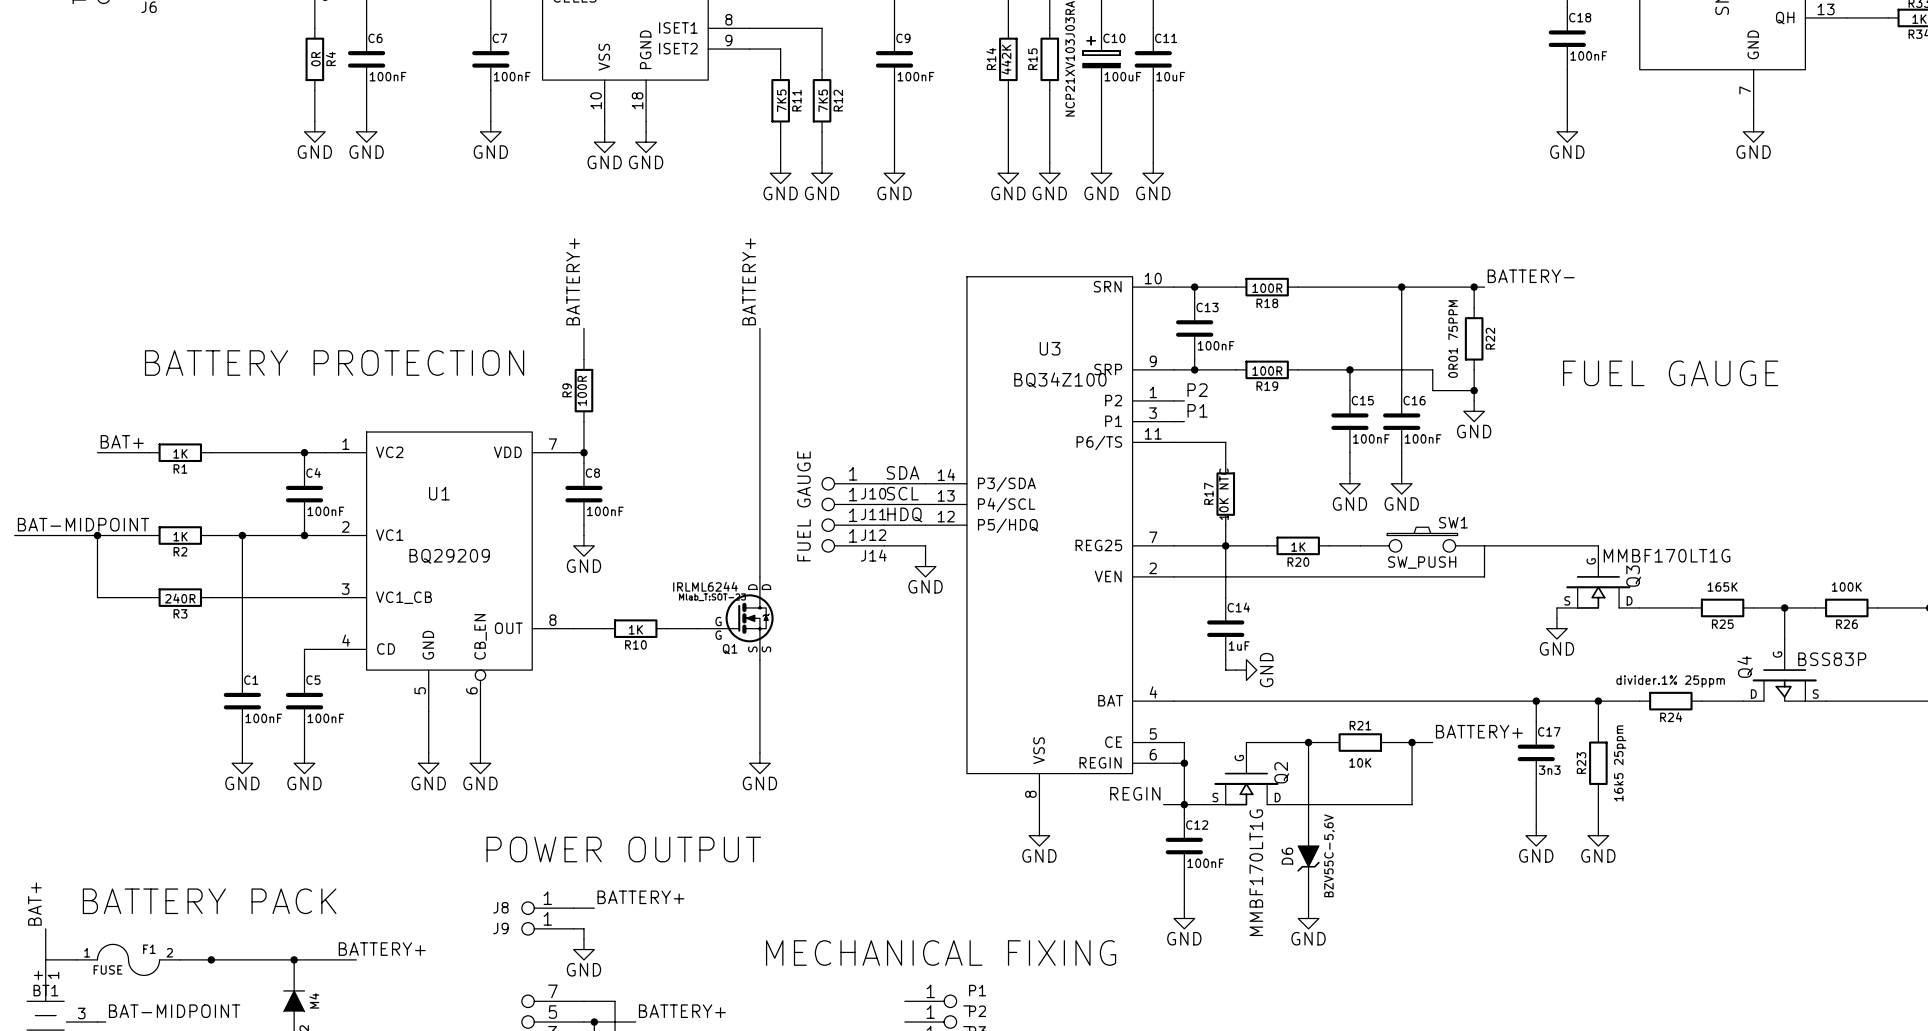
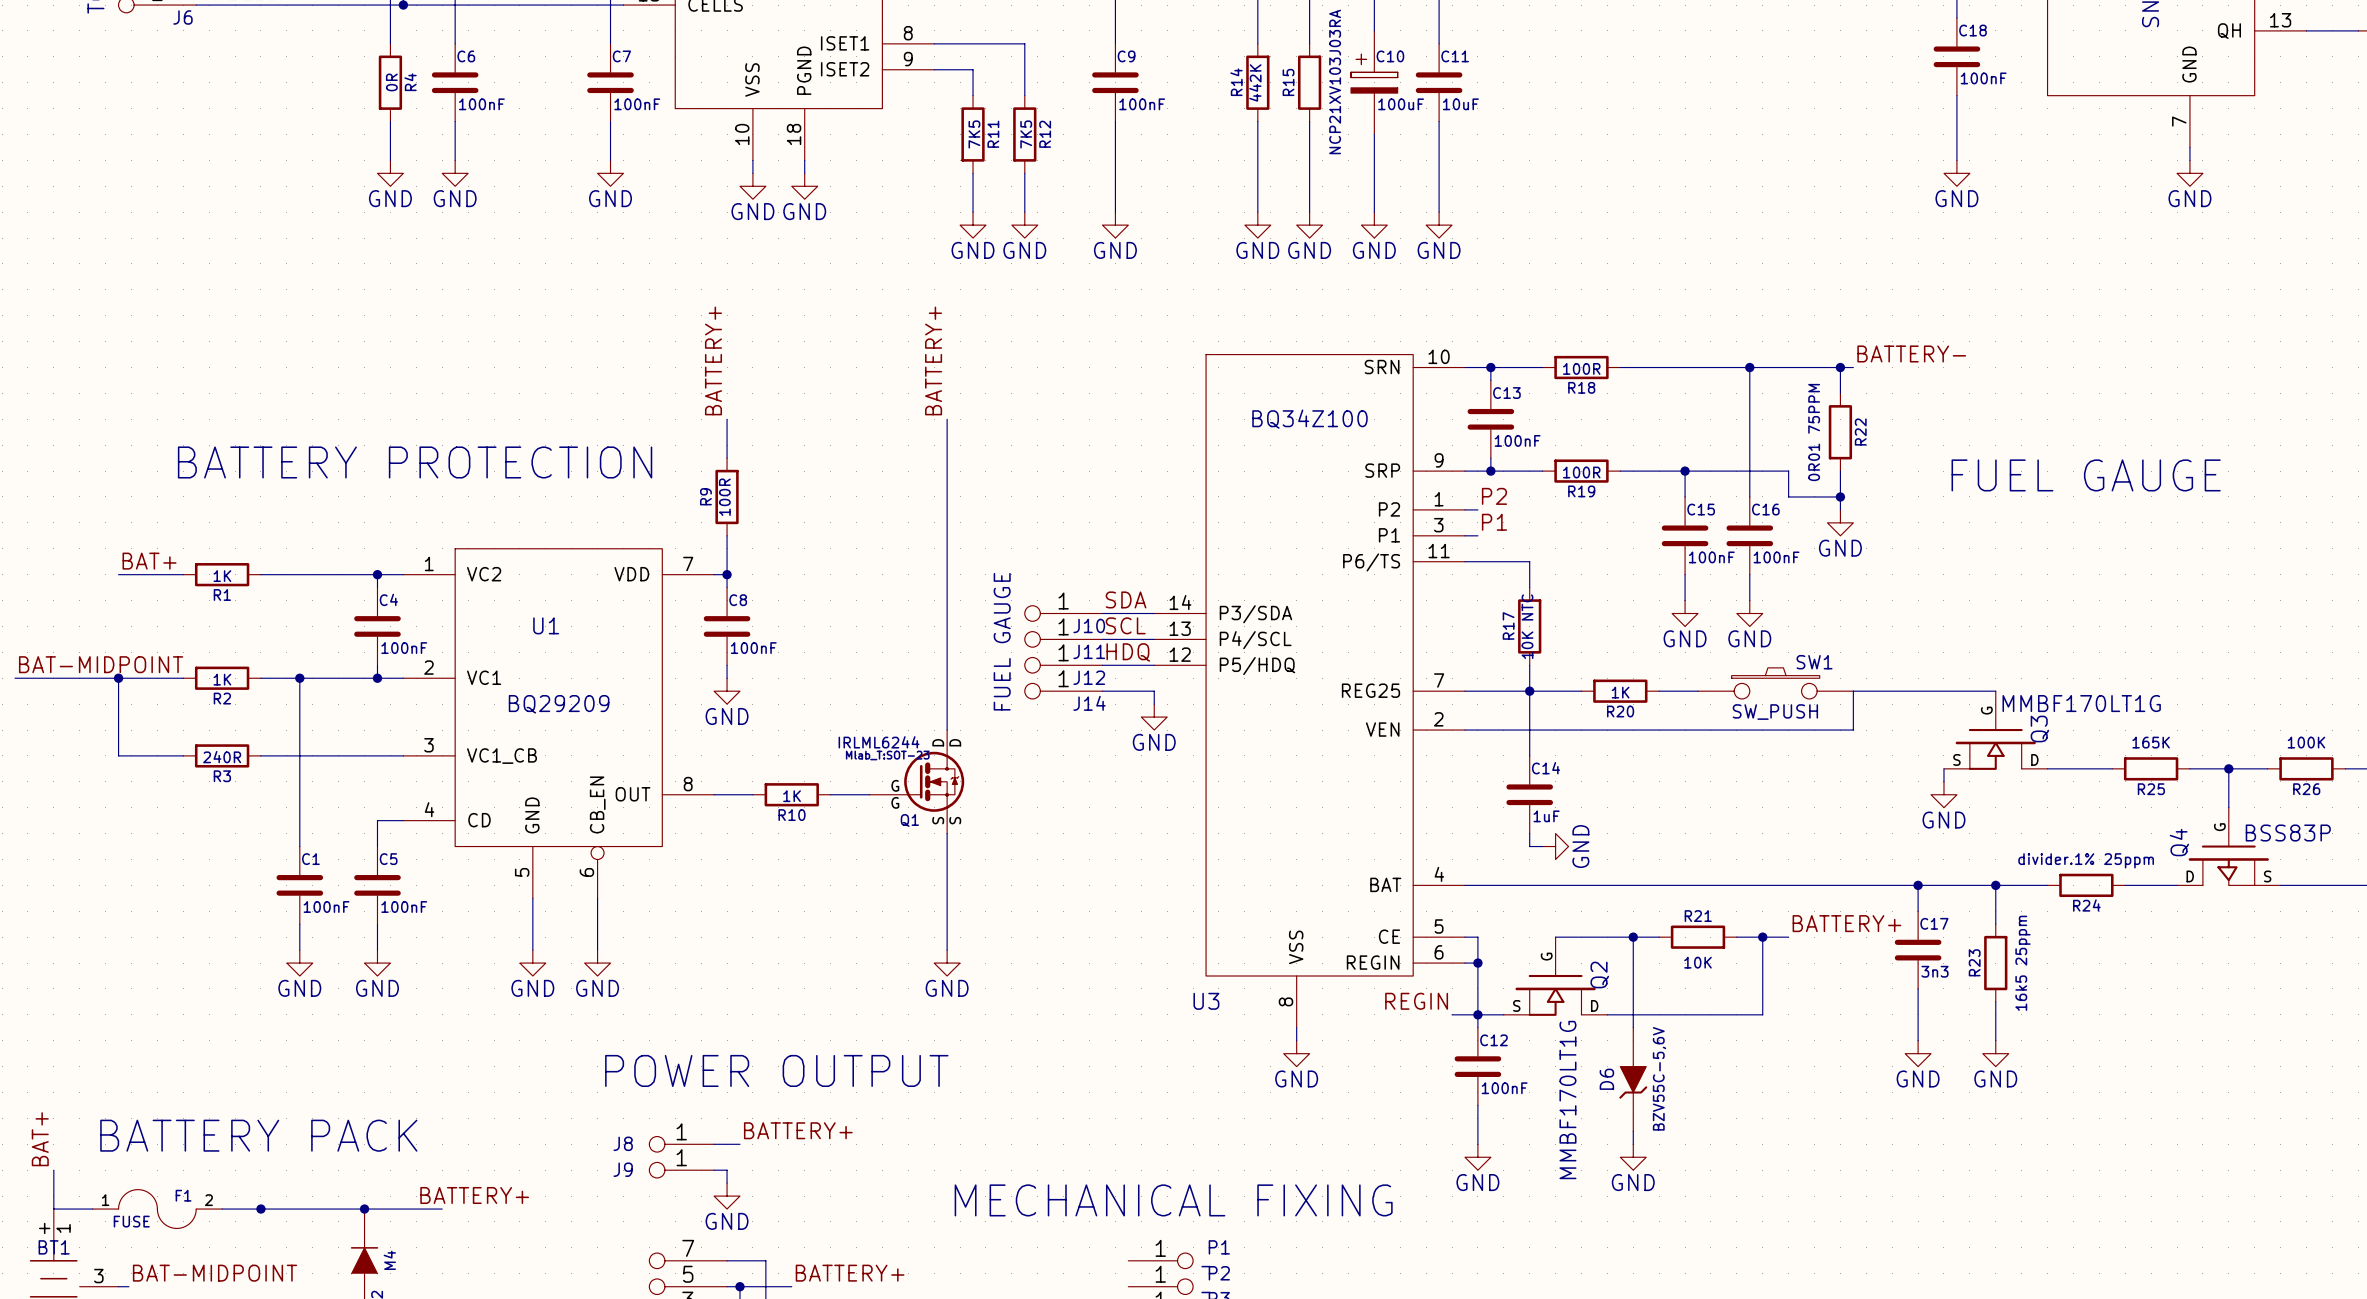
U3 name position: U3 (1050, 348) -> U3 (1206, 1001)
U3 value position: BQ34Z100 (1060, 380) -> BQ34Z100 (1309, 419)

